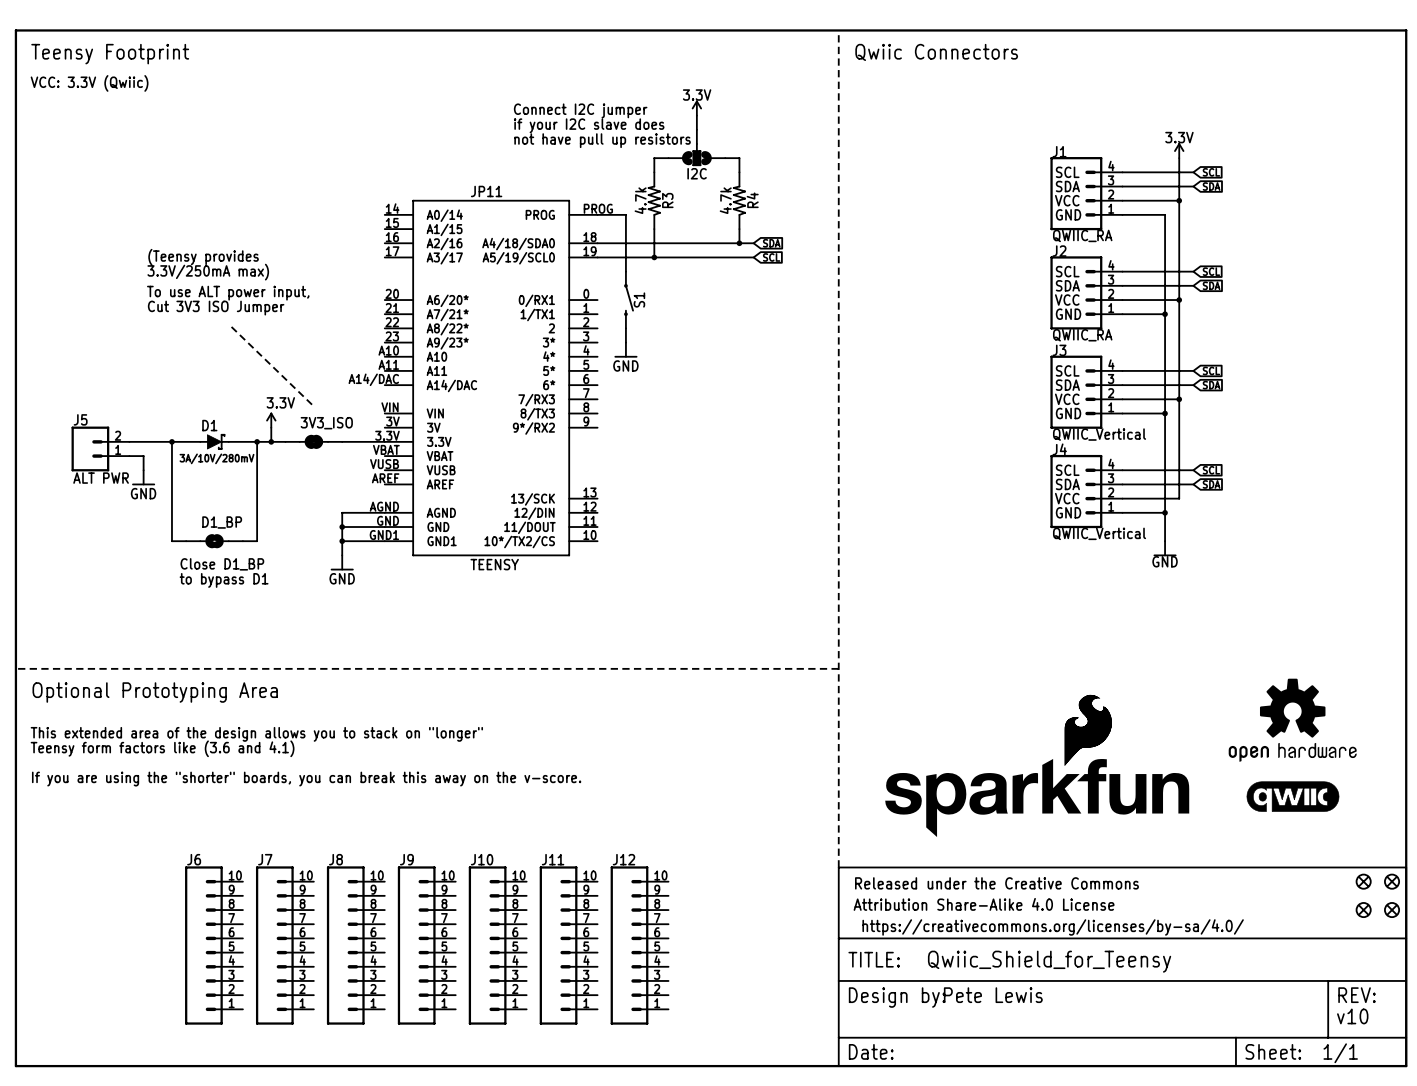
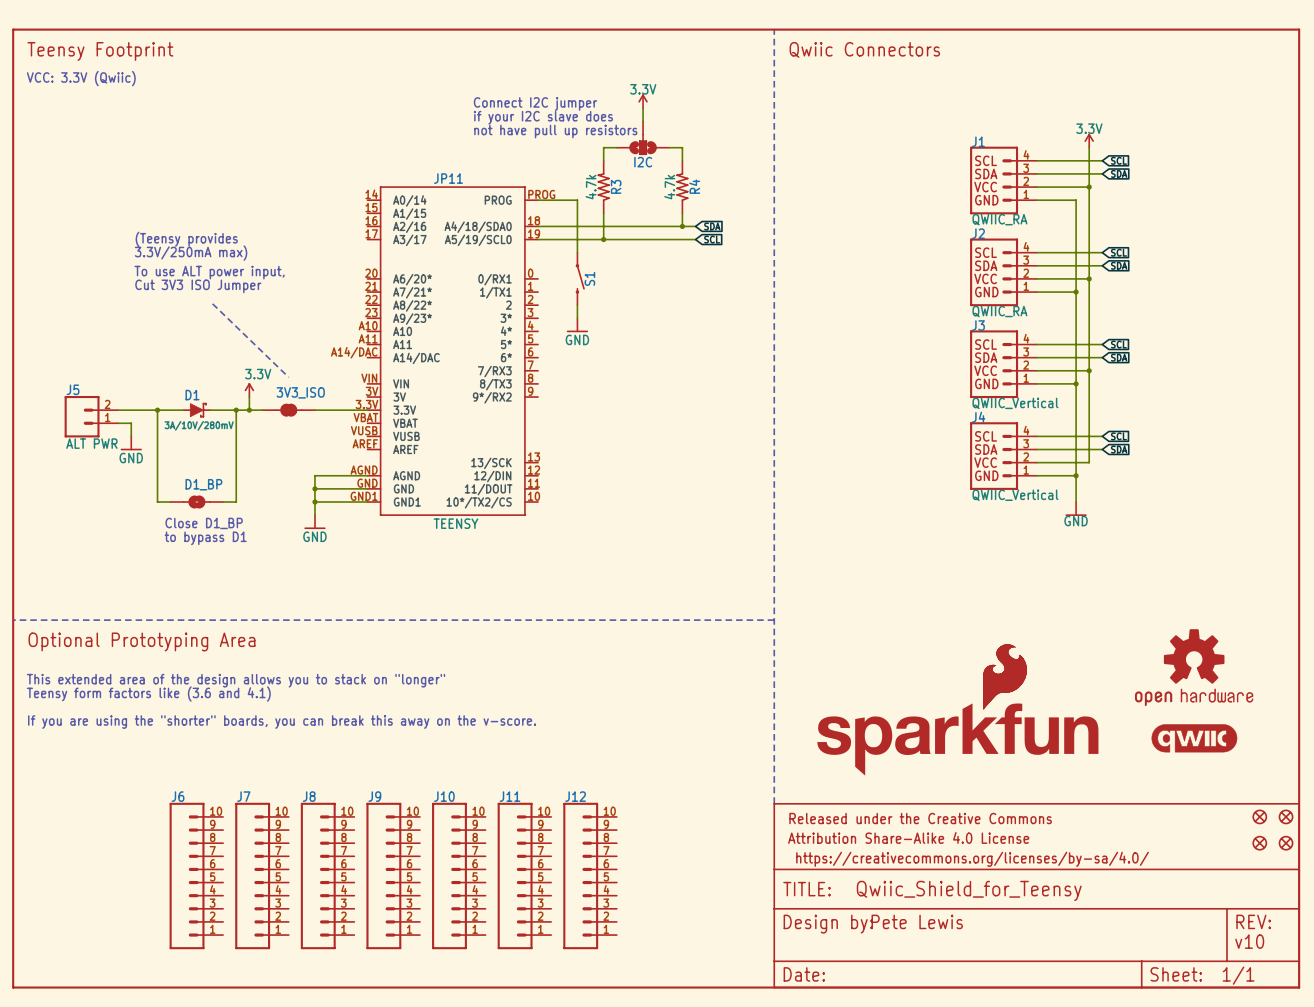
JP11 symbol: [384, 200, 598, 557] -> [367, 186, 539, 516]

